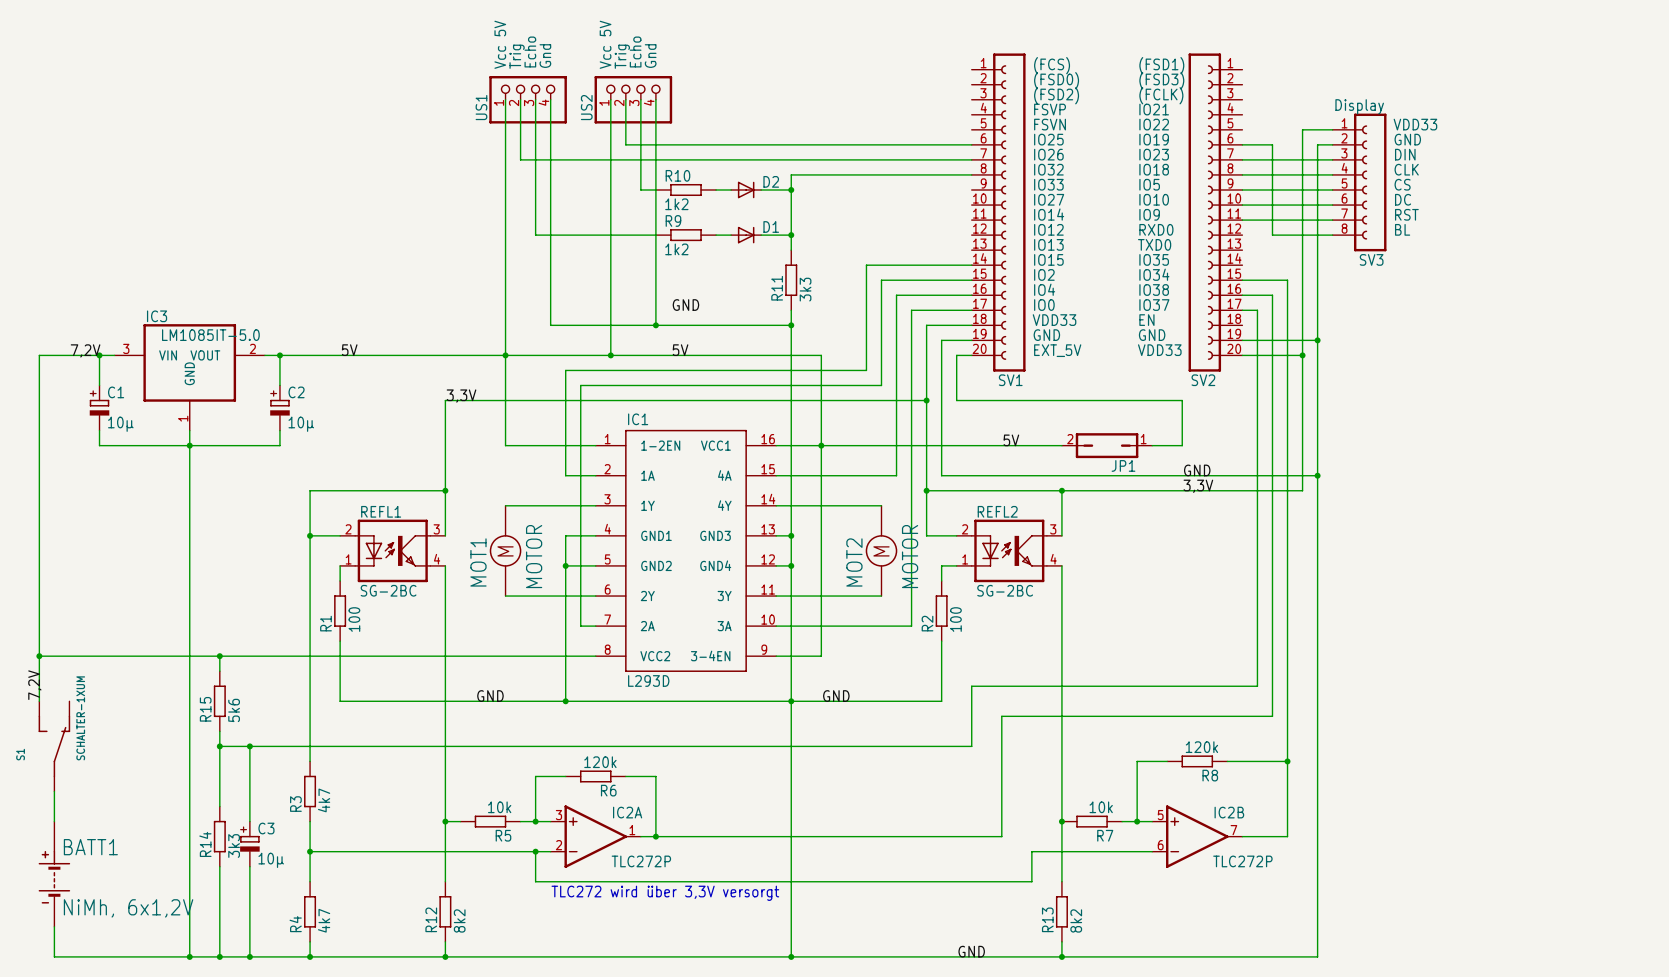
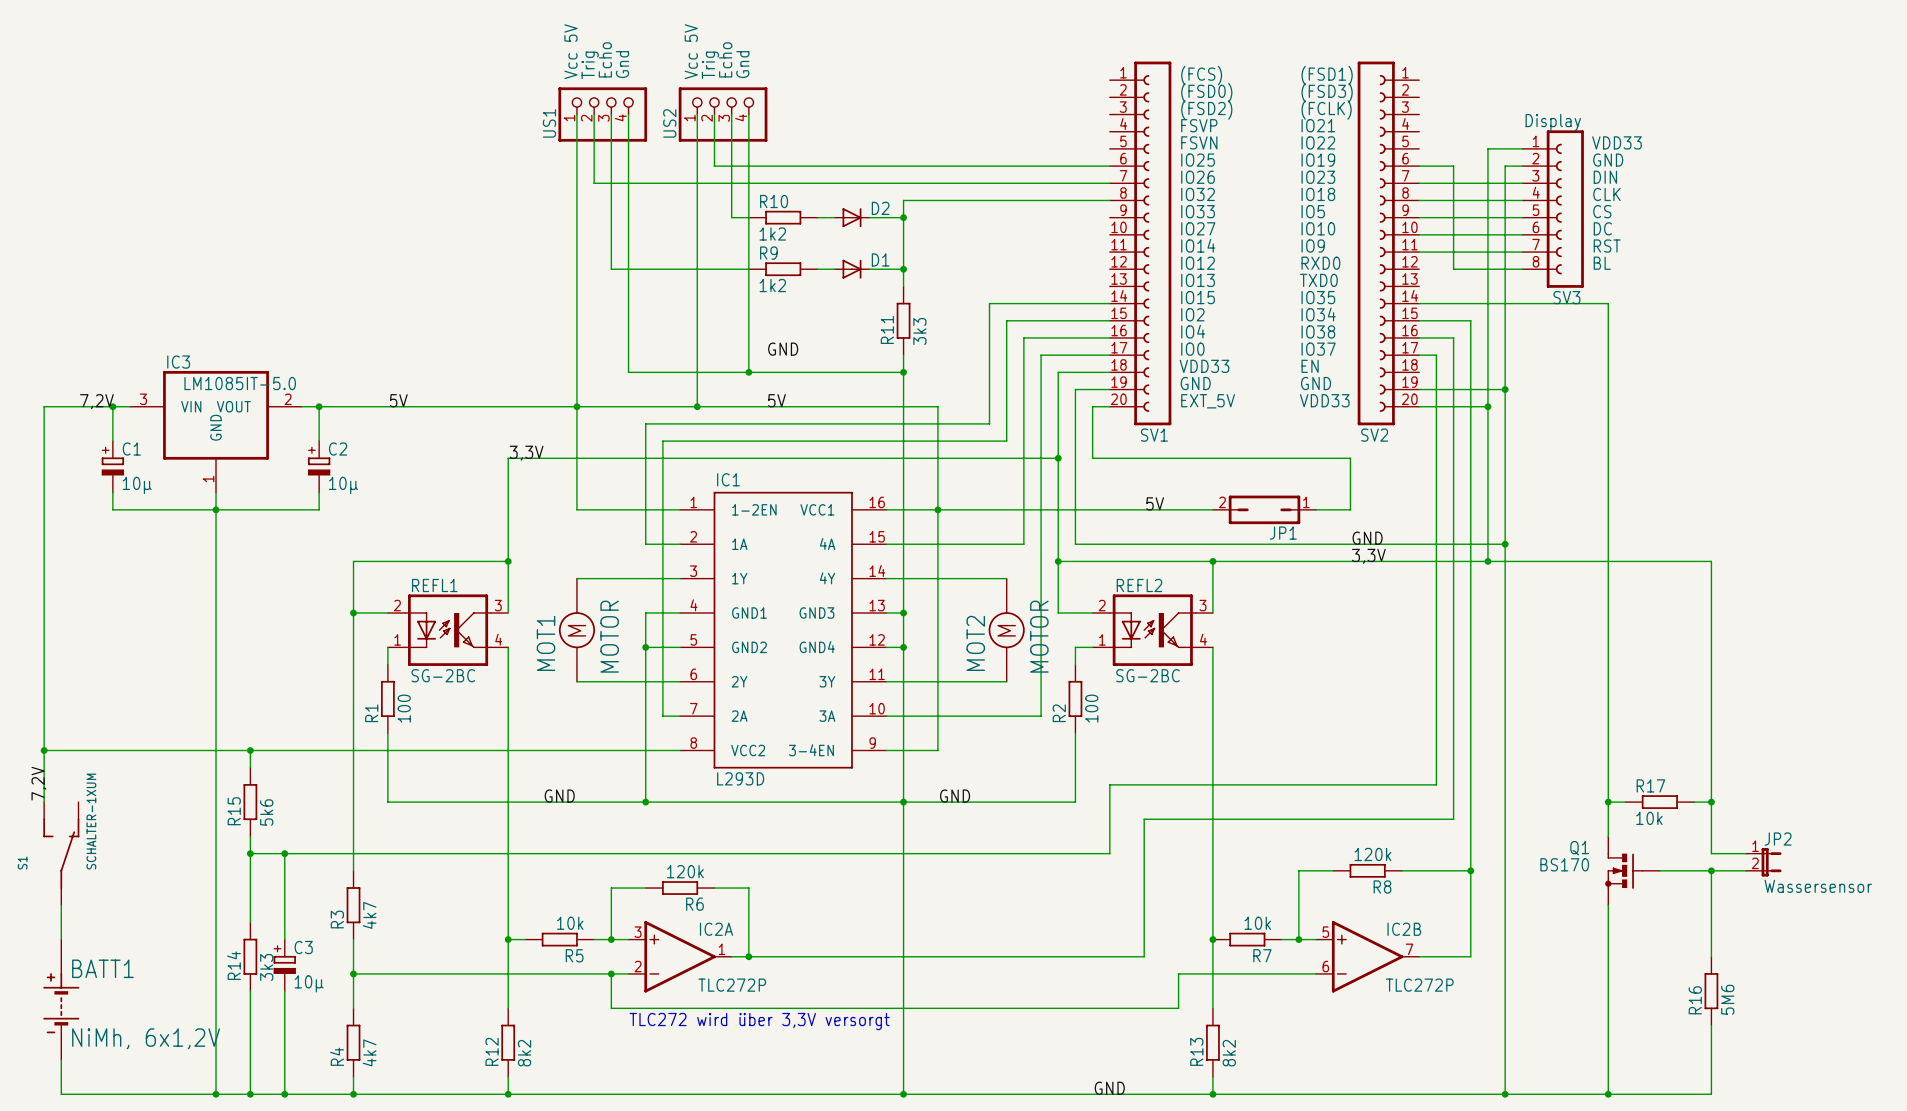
wire: none -> (1419, 303) (1608, 303) (1608, 836)
wire: none -> (1487, 561) (1711, 561) (1711, 853) (1745, 853)
junction: none -> (1487, 561)
wire: none -> (1608, 802) (1625, 802)
junction: none -> (1608, 802)
R17: none -> 10k (1659, 802)
wire: none -> (1694, 802) (1711, 802)
junction: none -> (1711, 802)
JP2: none -> Wassersensor (1763, 862)
Q1: none -> BS170 (1632, 870)
wire: none -> (1659, 870) (1745, 870)
wire: none -> (1711, 870) (1711, 956)
junction: none -> (1711, 870)
wire: none -> (1608, 905) (1608, 1094)
R16: none -> 5M6 (1711, 991)
wire: none -> (1711, 1025) (1711, 1094) (1505, 1094)
junction: none -> (1505, 1094)
junction: none -> (1608, 1094)

